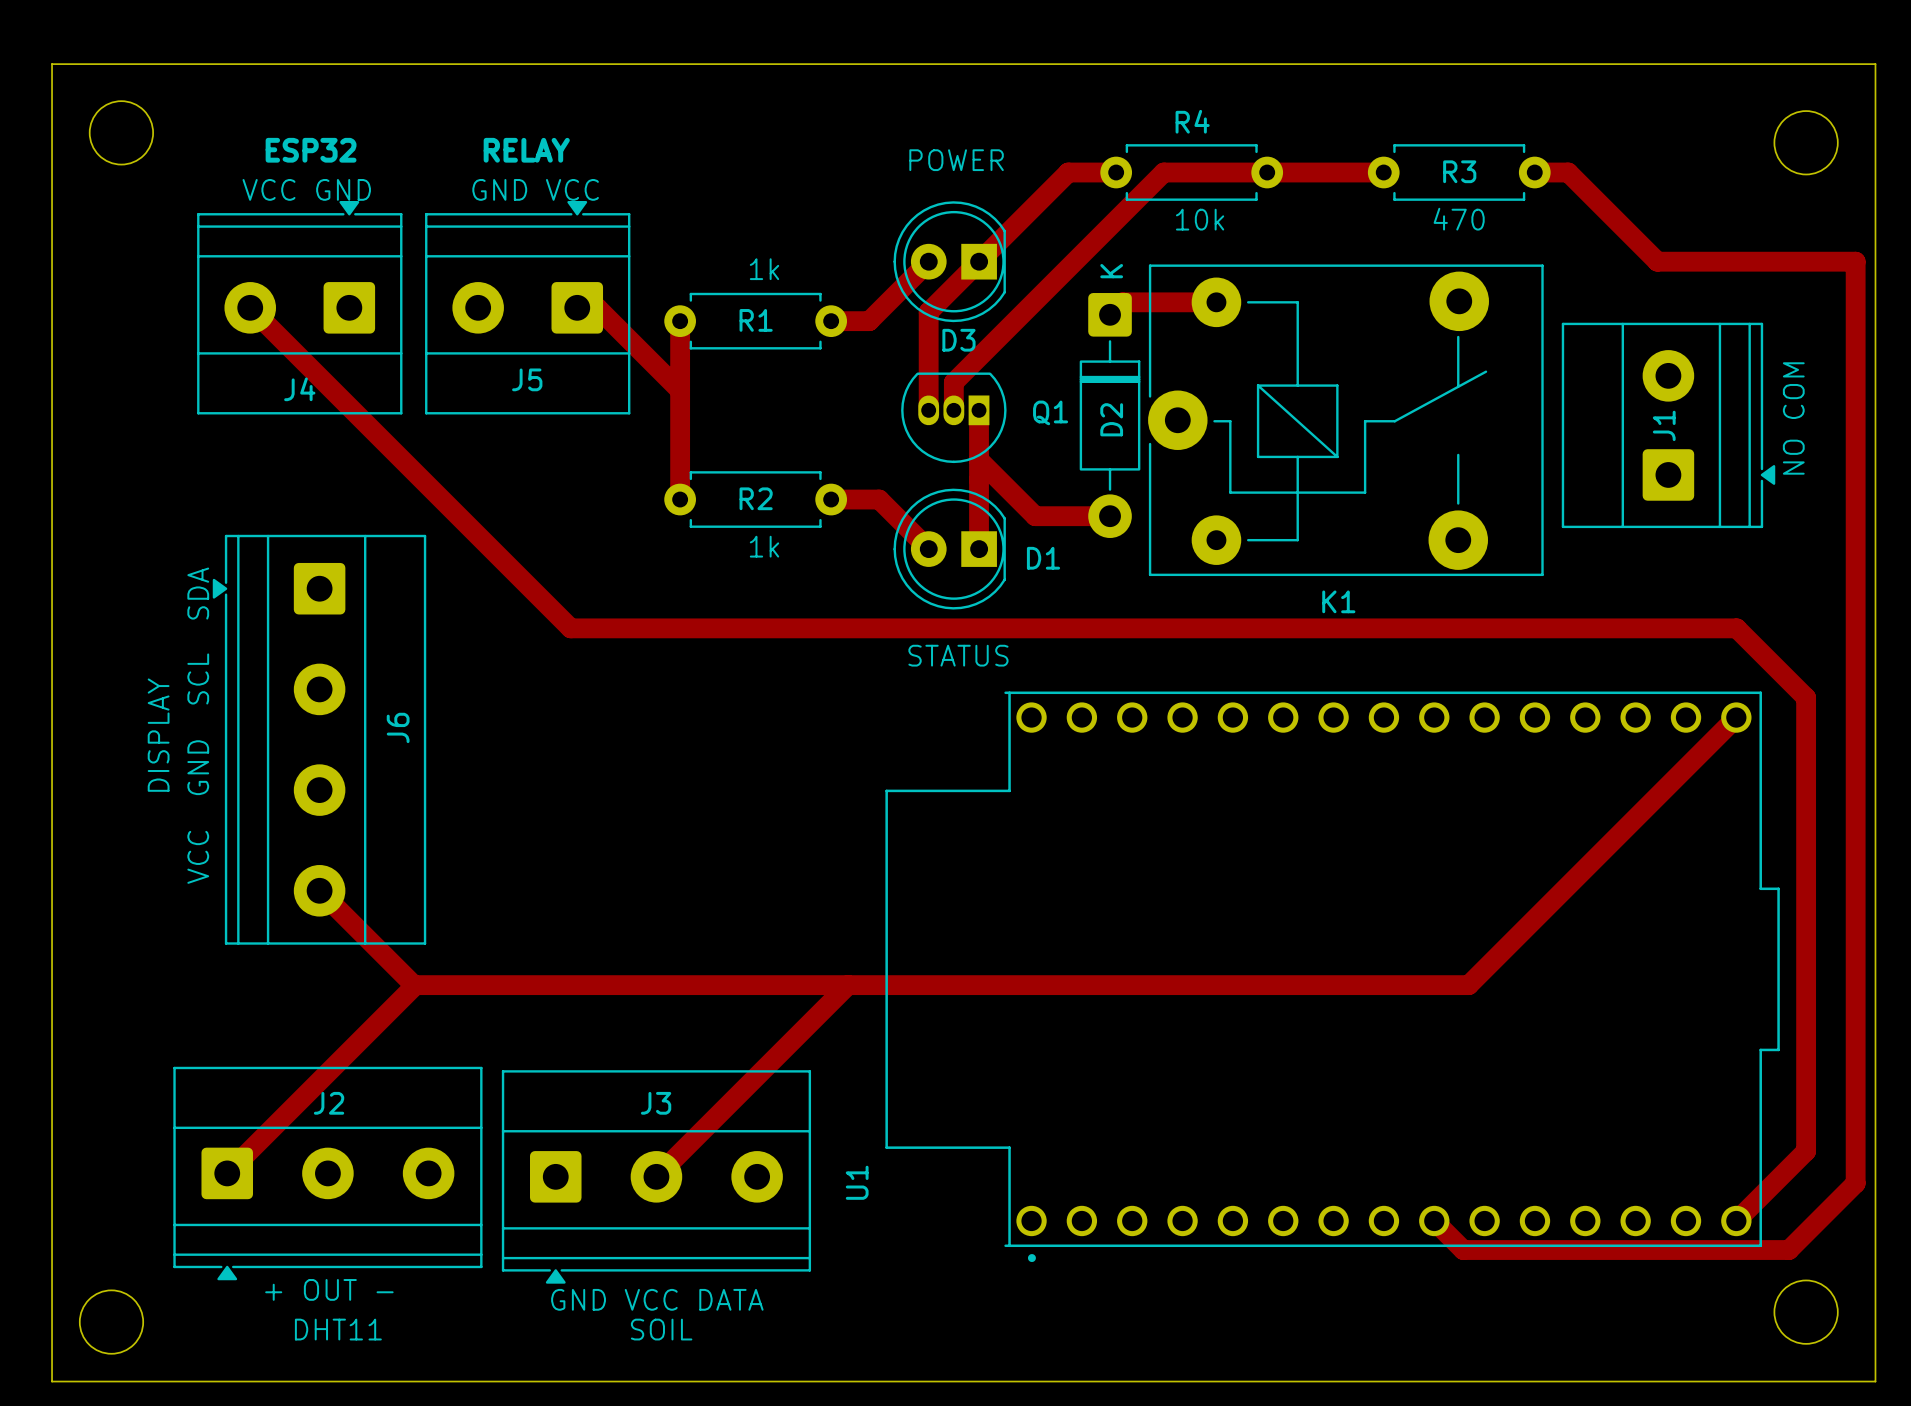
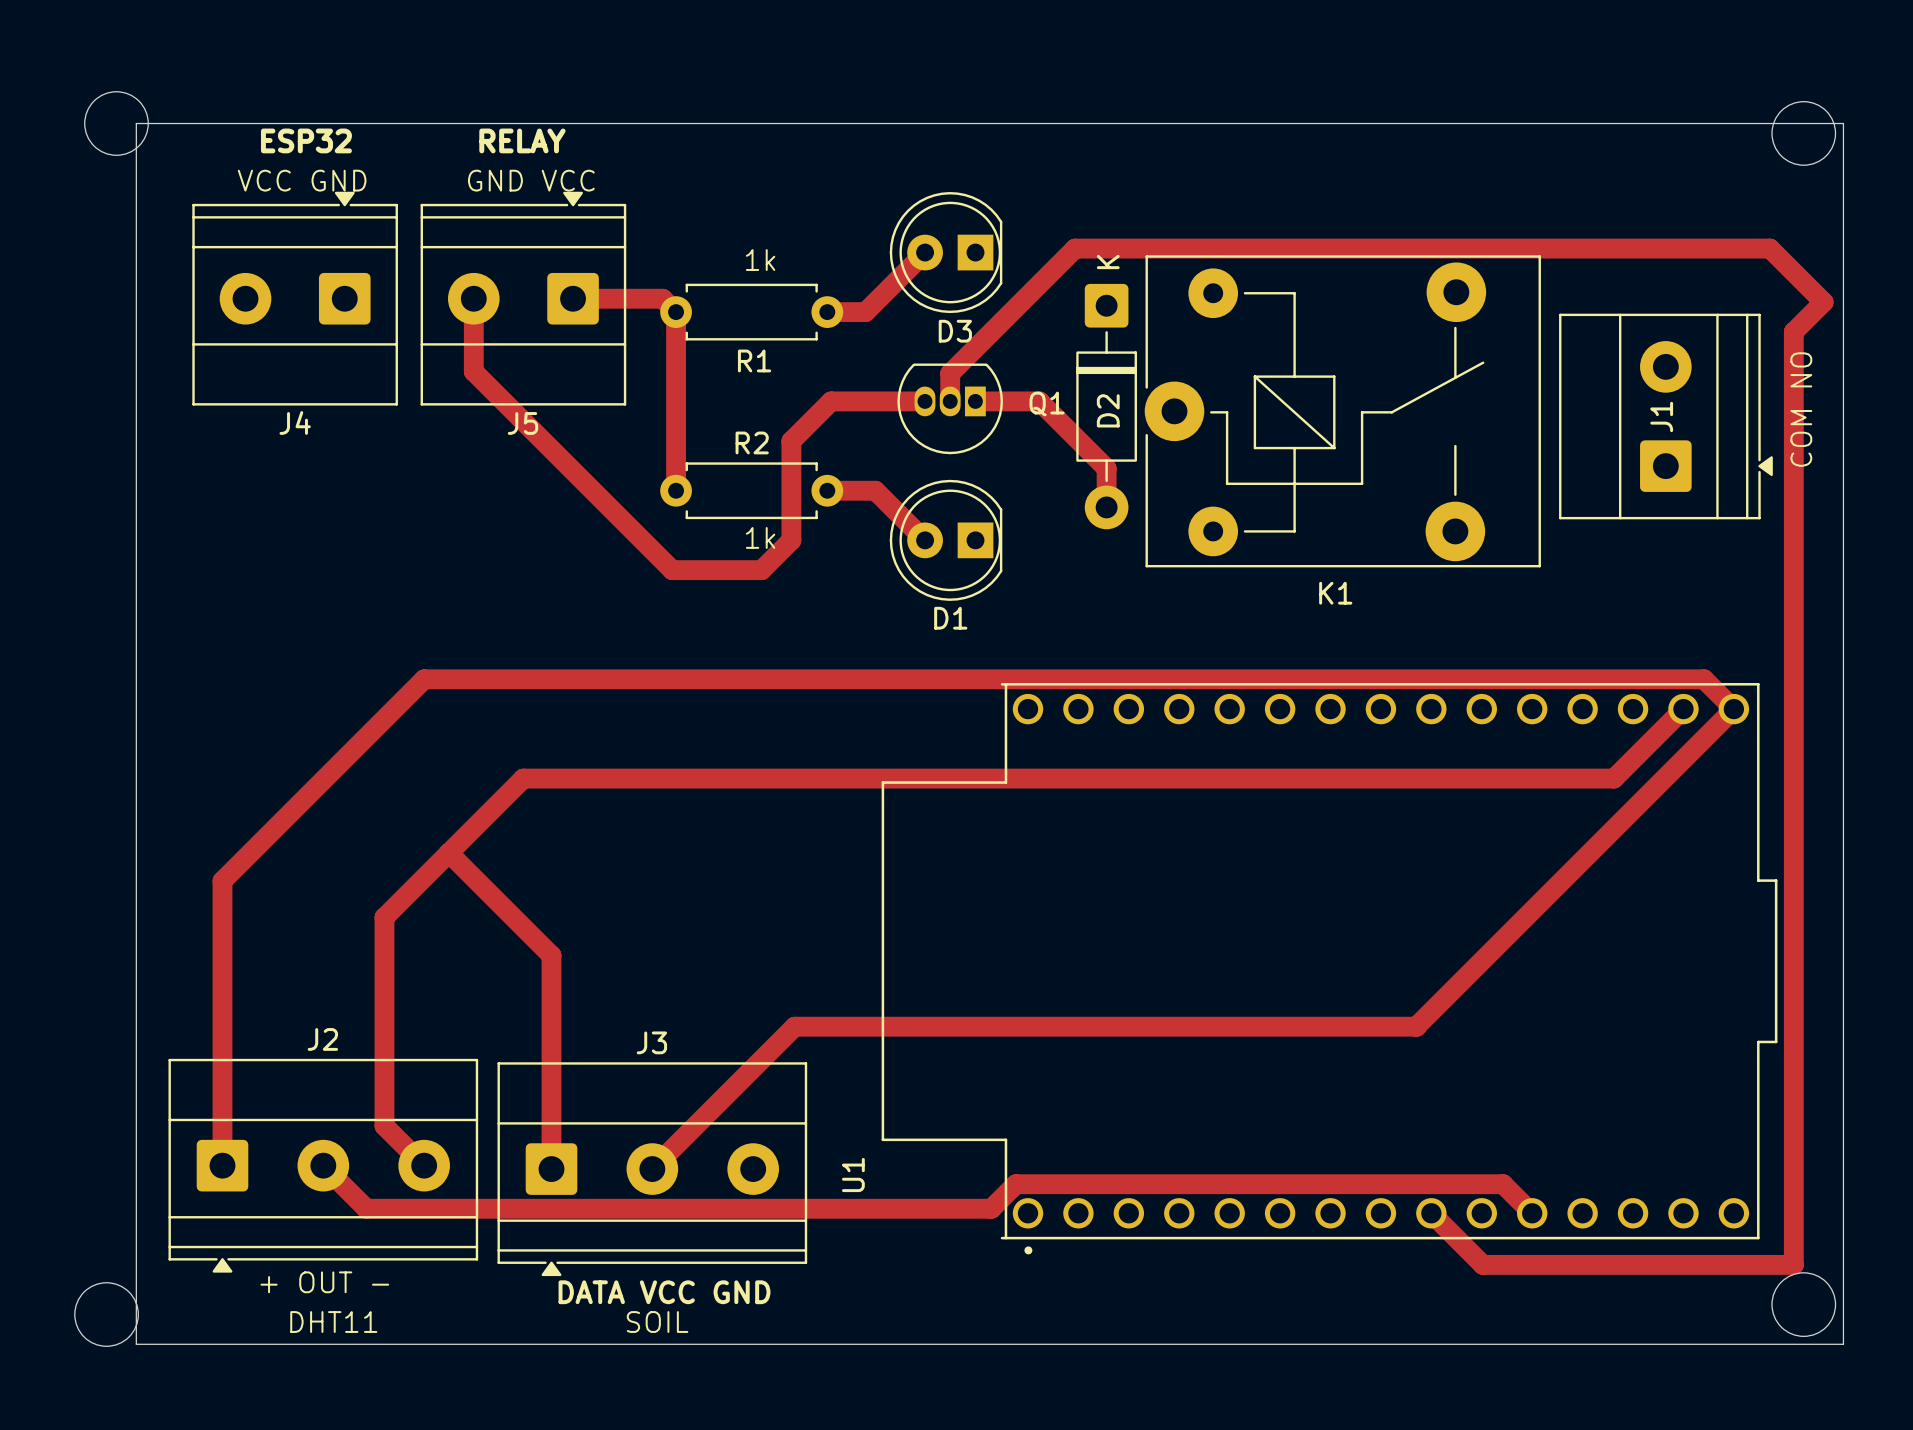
board edge: (52, 64) (1875, 64) (1875, 1381) (52, 1381) (52, 64) -> (136, 123) (136, 1344) (1843, 1344) (1843, 123) (136, 123)
text: POWER (956, 160) -> none
track: (1116, 172) (1068, 172) (928, 312) (928, 410) -> (473, 298) (473, 371) (672, 570) (761, 570) (791, 540) (791, 441) (831, 401) (924, 401)
R4: (1191, 172) -> none
track: (1383, 172) (1163, 172) (1078, 257) -> none
R3: (1459, 172) -> none
track: (1534, 172) (1568, 172) (1657, 261) (1855, 261) (1855, 1183) (1788, 1250) (1463, 1250) -> (1075, 248) (1770, 248) (1823, 302) (1793, 331) (1793, 1264) (1482, 1264) (1460, 1242)
text: 10k (1200, 219) -> none
text: 470 (1459, 219) -> none
track: (1216, 302) (1122, 302) (1110, 314) -> none
track: (250, 307) (570, 628) (1736, 628) (1806, 697) (1806, 1151) (1736, 1220) -> none
track: (597, 307) (680, 390) -> (593, 298) (662, 298) (676, 312)
R1 name position: R1 (756, 320) -> R1 (754, 360)
J5 name position: J5 (527, 379) -> J5 (522, 423)
J4 name position: J4 (299, 389) -> J4 (295, 422)
track: (979, 410) (979, 548) -> none
text: NO COM (1793, 418) -> COM NO (1801, 409)
track: (979, 459) (1035, 516) (1110, 516) -> (975, 401) (1039, 401) (1106, 468) (1106, 507)
R2 name position: R2 (756, 498) -> R2 (752, 442)
D1 name position: D1 (1043, 558) -> D1 (950, 618)
text: STATUS (958, 655) -> none
track: none -> (1683, 709) (1613, 778) (523, 778) (384, 917) (384, 1125) (424, 1165)
text: VCC GND SCL SDA (198, 725) -> none
text: DISPLAY (158, 735) -> none
J6: (319, 739) -> none
track: none -> (448, 853) (551, 955) (551, 1169)
track: (319, 890) (413, 985) (1468, 985) -> (1416, 1026) (1465, 977)
track: (415, 985) (227, 1173) -> (1733, 709) (1704, 679) (424, 679) (222, 880) (222, 1165)
track: (848, 985) (798, 1034) -> (1416, 1026) (794, 1026)
J2 name position: J2 (329, 1103) -> J2 (322, 1039)
J3 name position: J3 (656, 1103) -> J3 (651, 1042)
track: none -> (323, 1165) (366, 1208) (991, 1208) (1015, 1184) (1503, 1184) (1532, 1213)
text: GND VCC DATA (657, 1299) -> DATA VCC GND (664, 1292)

